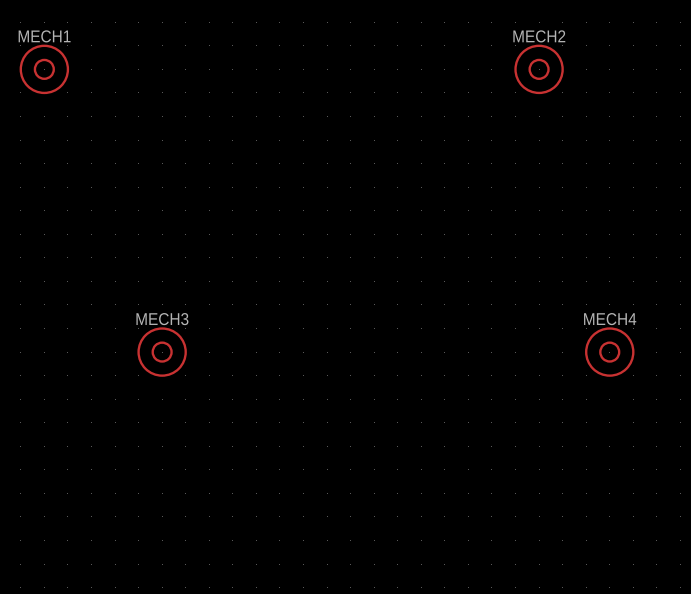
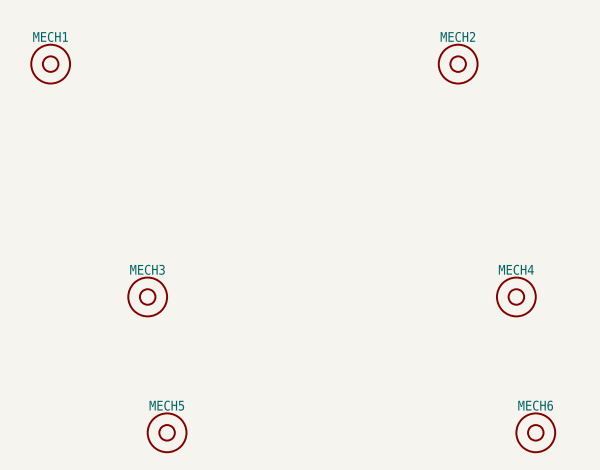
MECH5: none -> (167, 432)
MECH6: none -> (535, 432)

